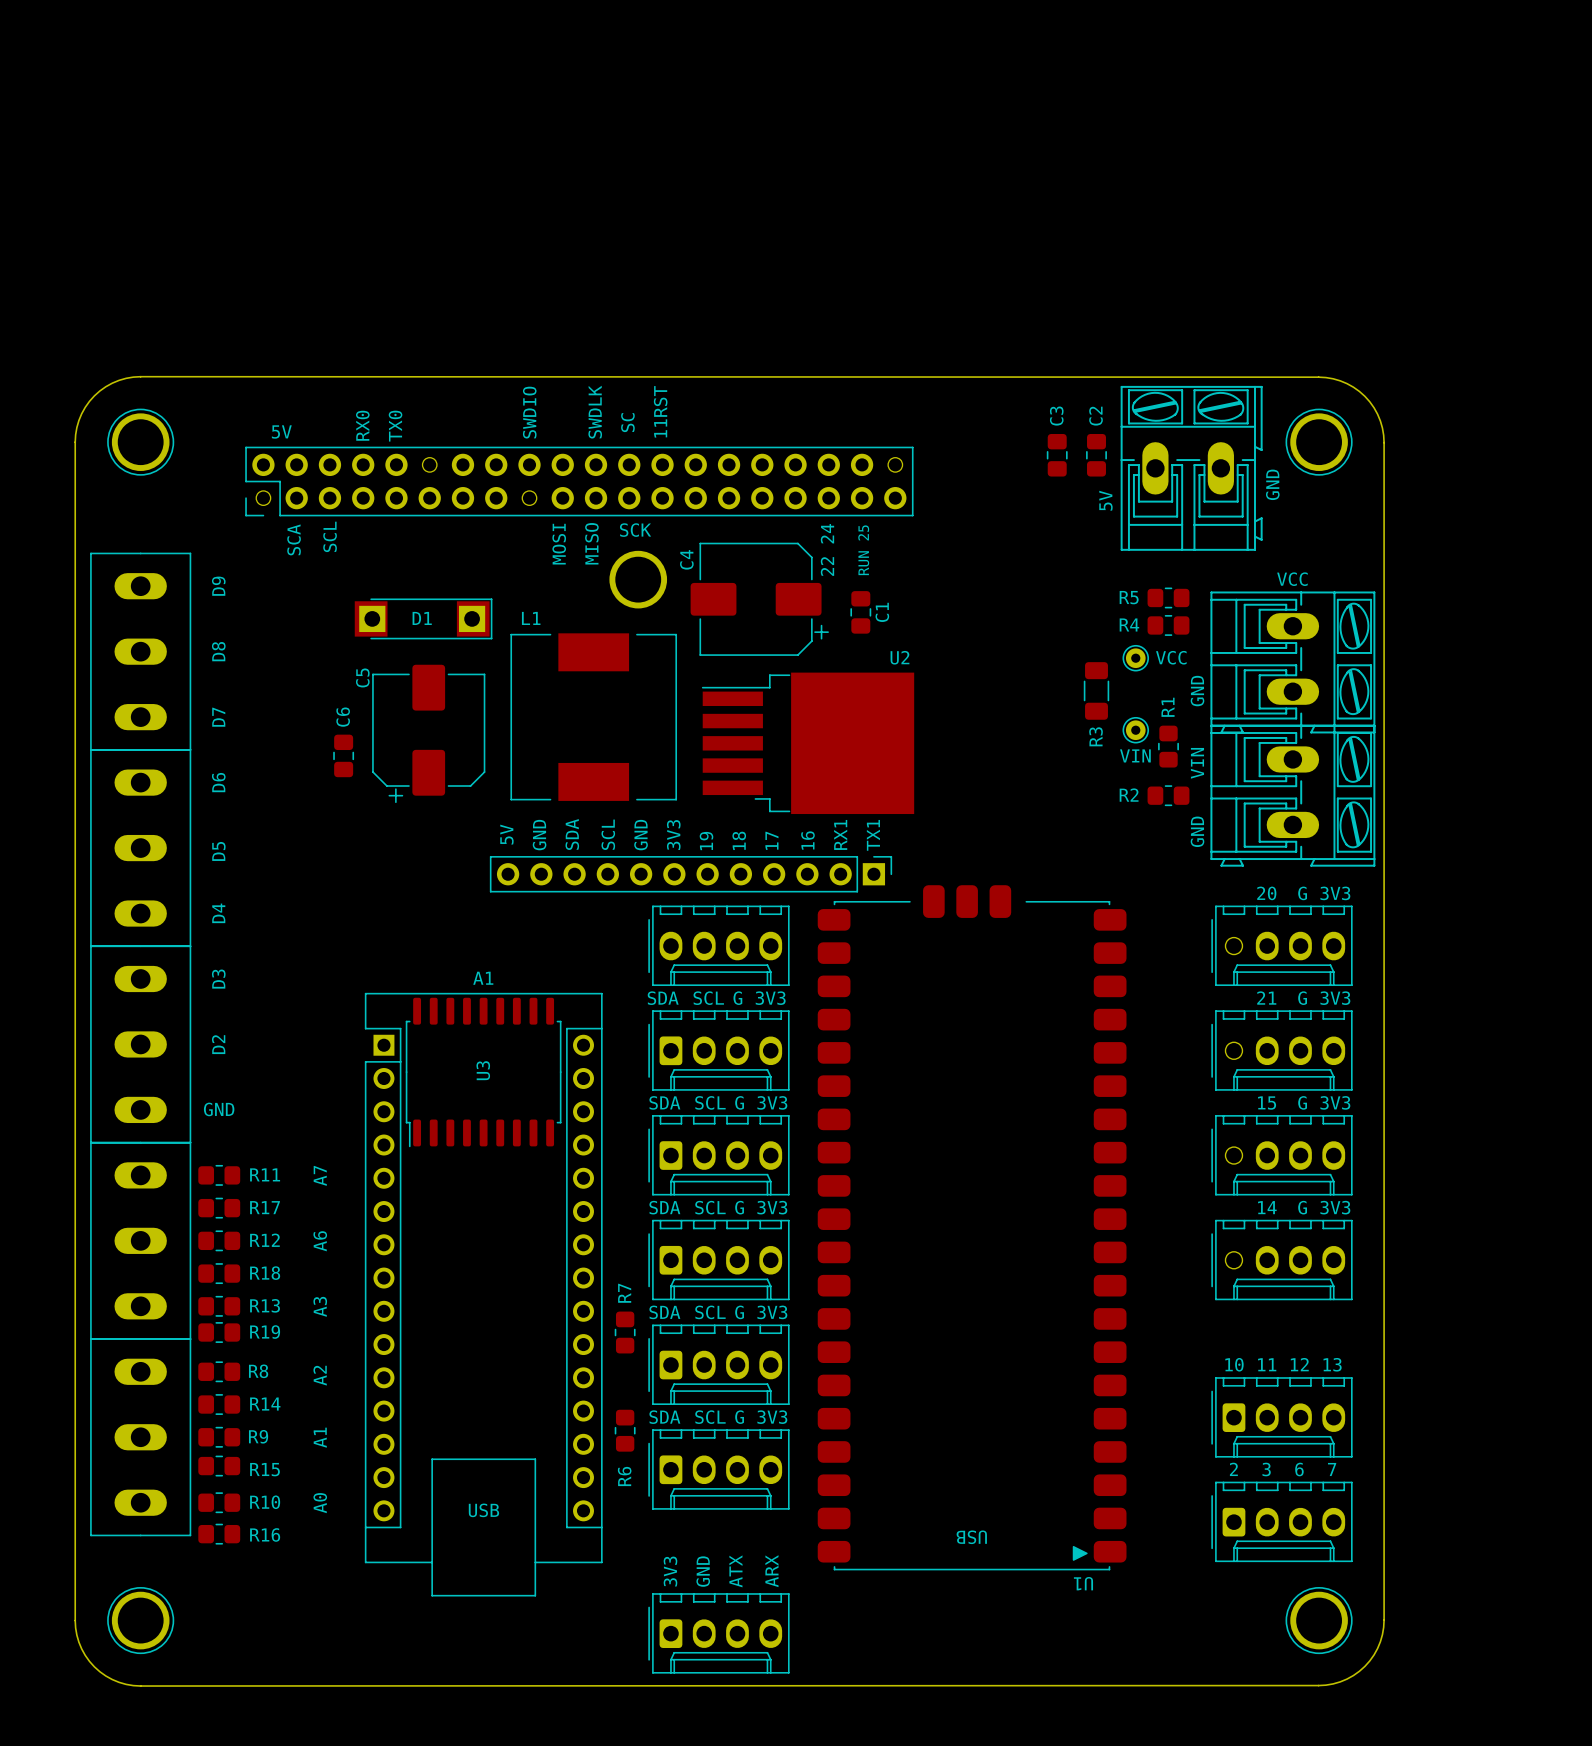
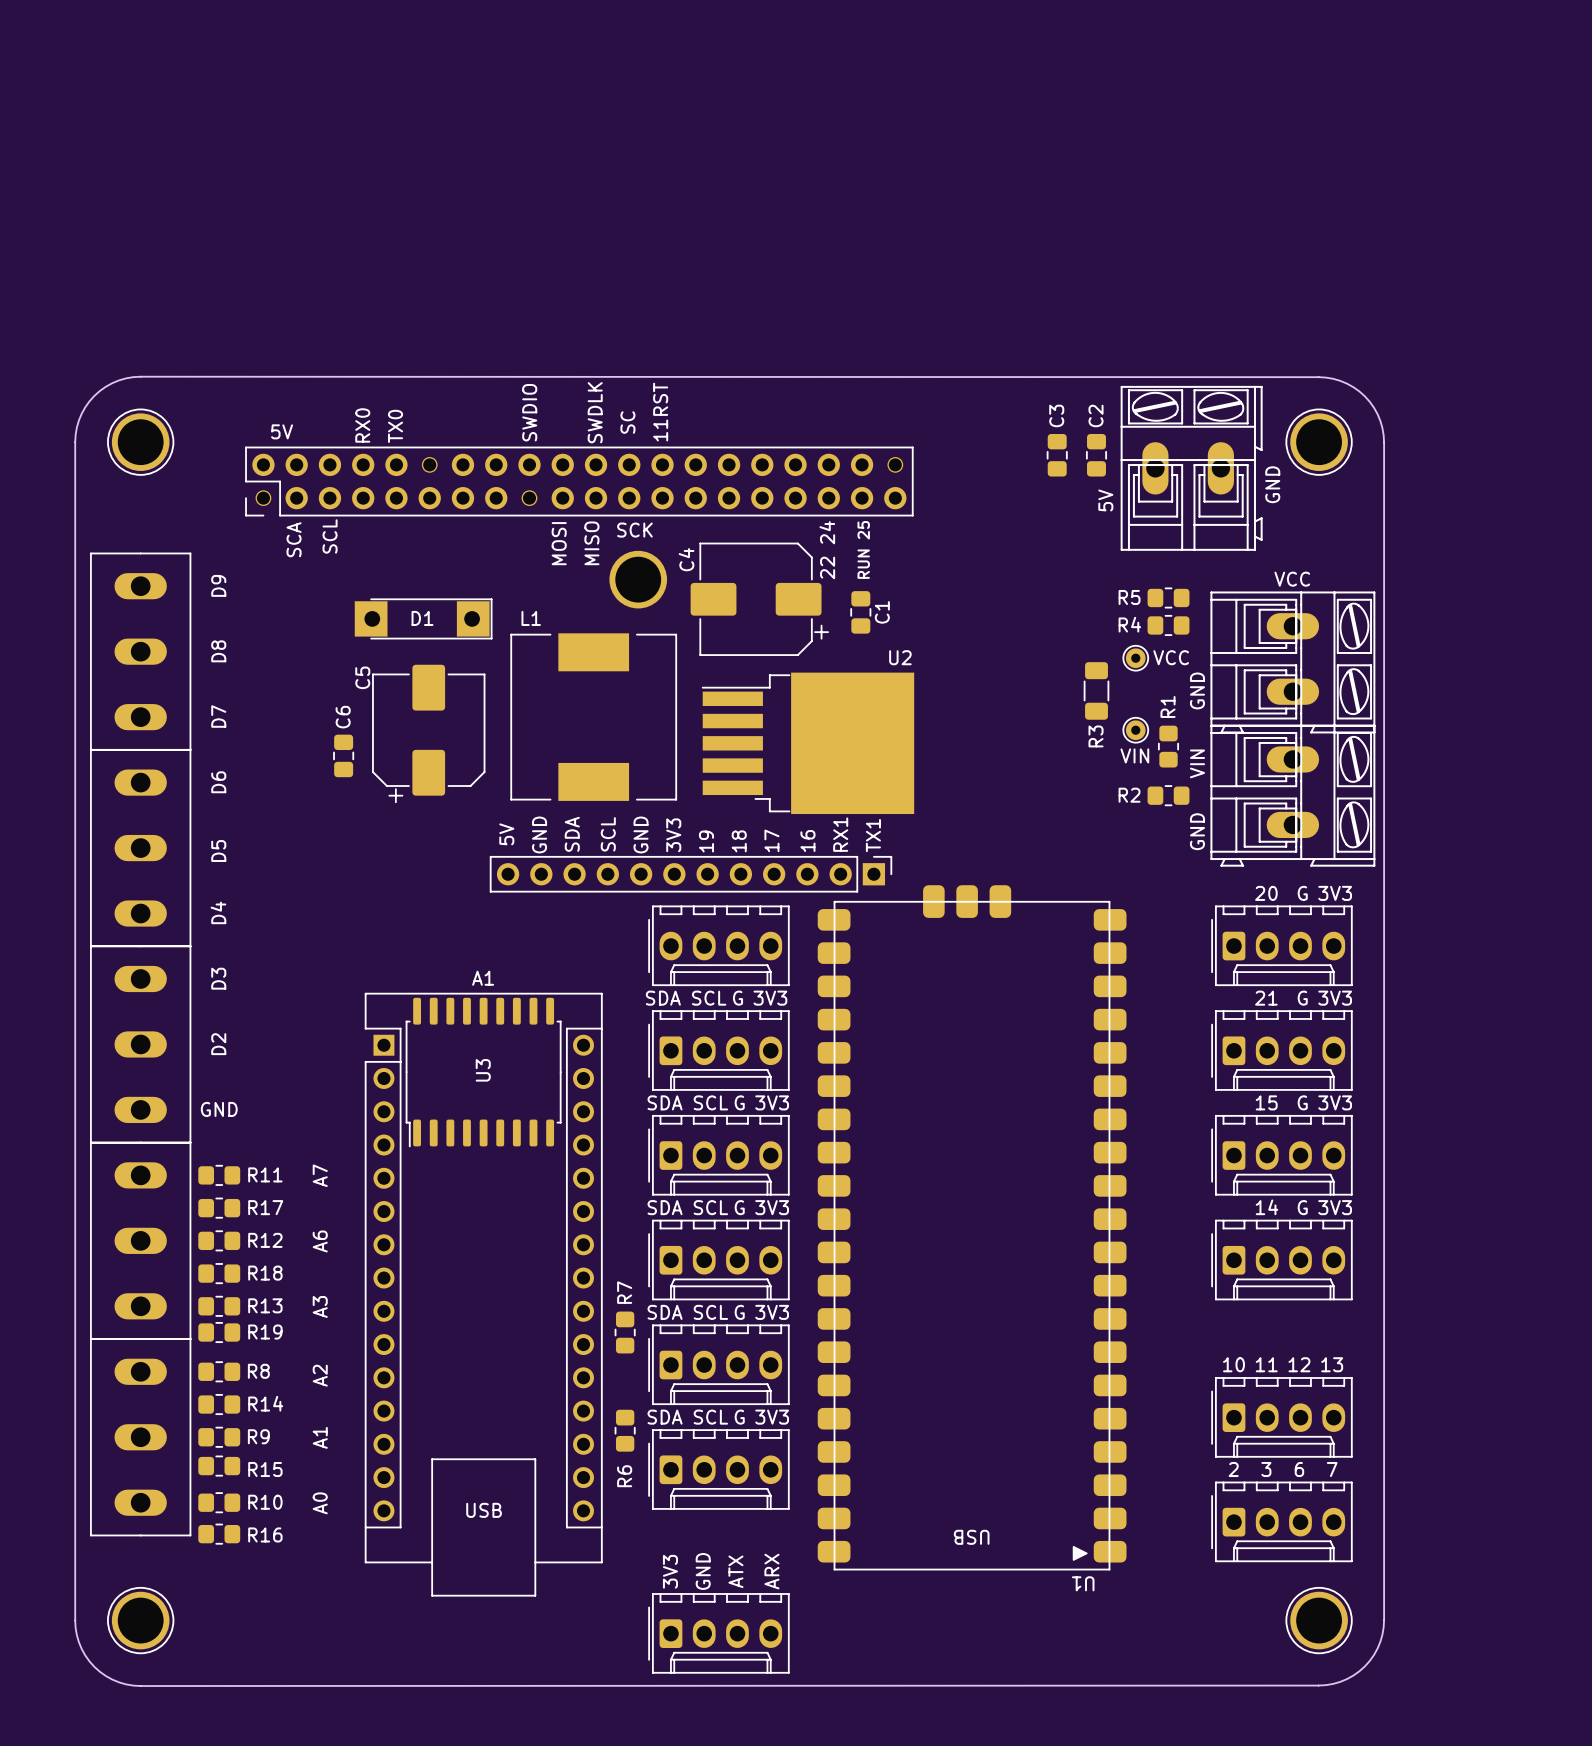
part footprint: [1120, 385, 1263, 551] -> [1120, 385, 1263, 551]
part footprint: [1210, 591, 1376, 734] -> [1210, 591, 1376, 734]
part footprint: [1210, 724, 1376, 867] -> [1210, 724, 1376, 867]
U1 footprint: [817, 885, 1127, 1571] -> [817, 885, 1127, 1571]
part footprint: [1211, 905, 1353, 986] -> [1211, 905, 1353, 986]
part footprint: [1211, 1010, 1353, 1091] -> [1211, 1010, 1353, 1091]
part footprint: [1211, 1115, 1353, 1196] -> [1211, 1115, 1353, 1196]
part footprint: [1211, 1219, 1353, 1301] -> [1211, 1219, 1353, 1301]

